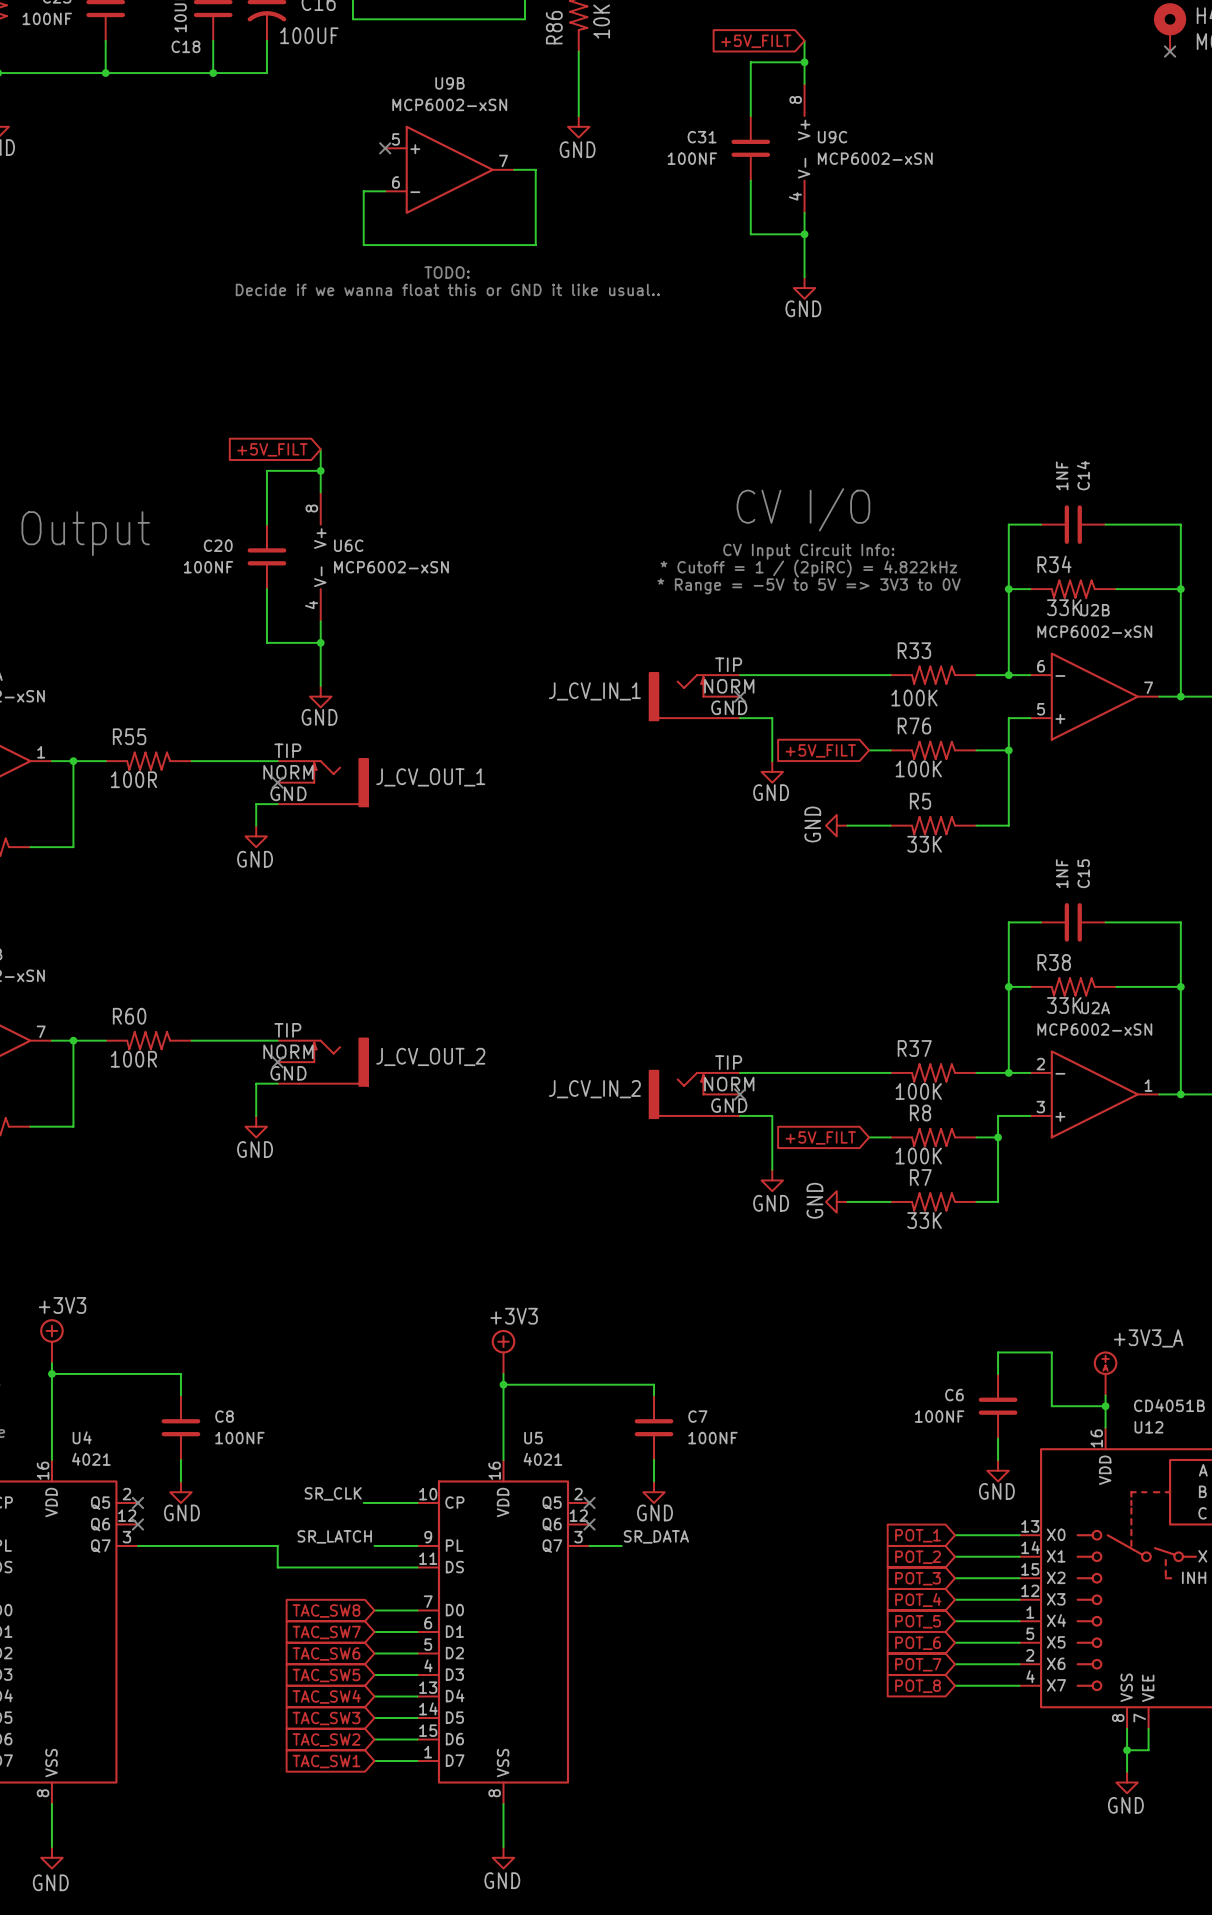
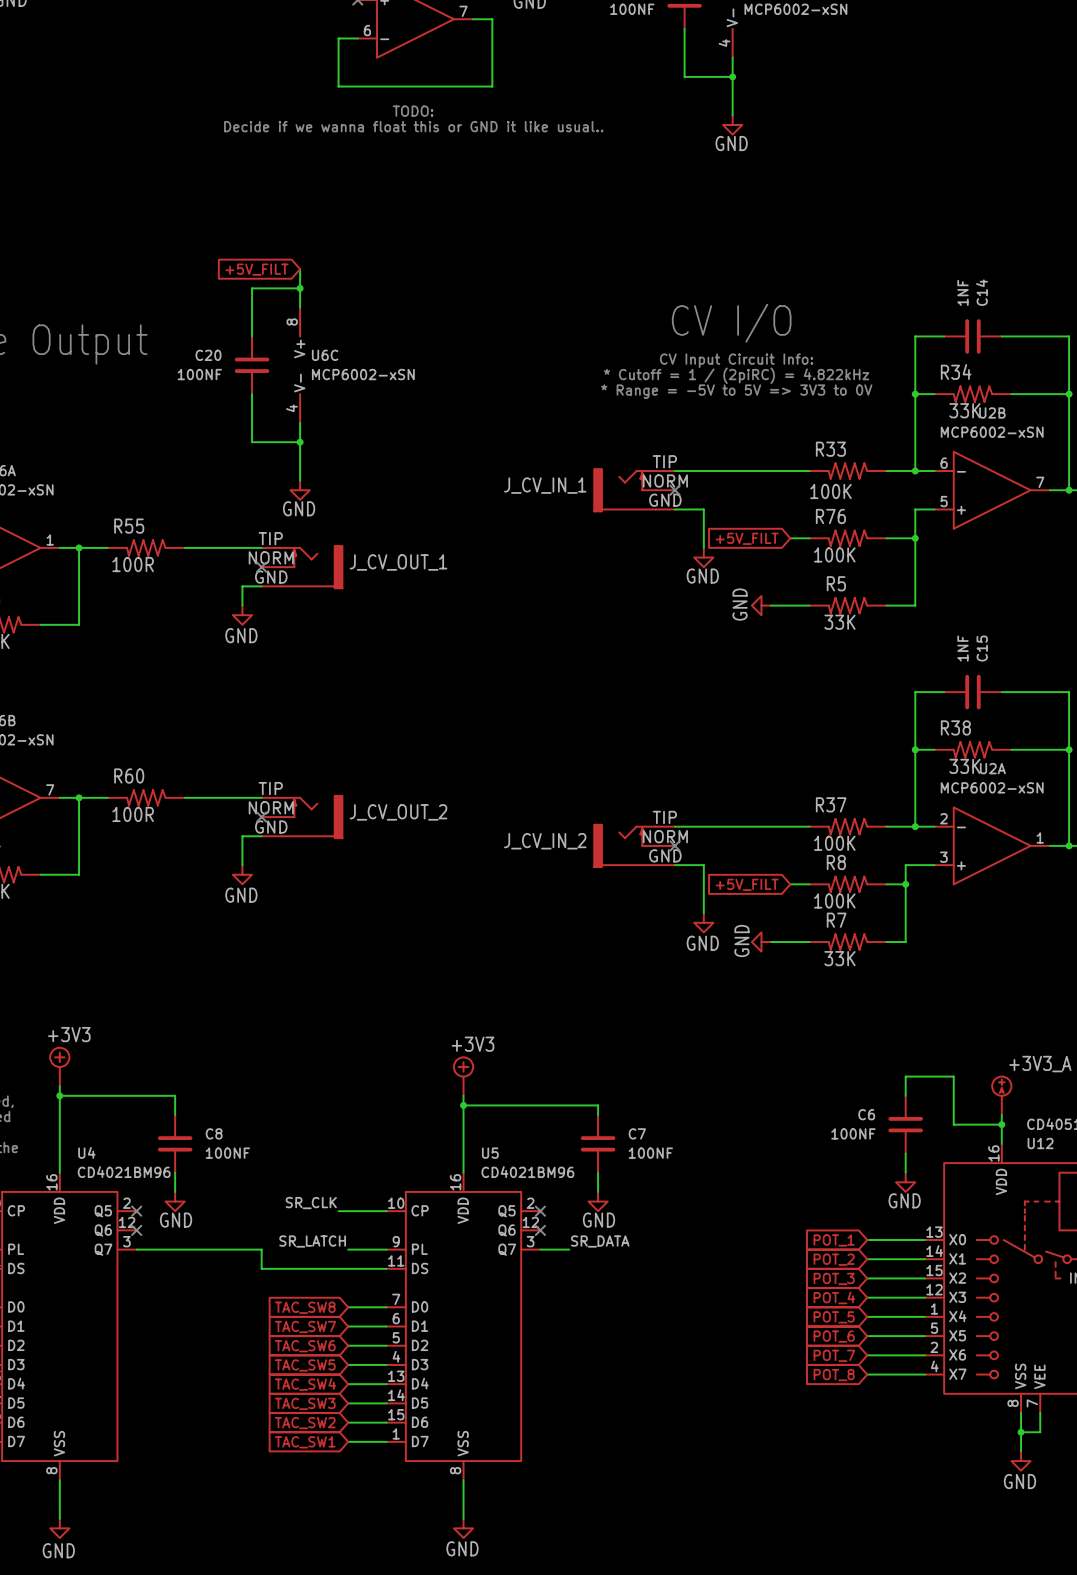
U4 value: 4021 (91, 1459) -> CD4021BM96 (124, 1172)
U5 value: 4021 (542, 1459) -> CD4021BM96 (527, 1172)

